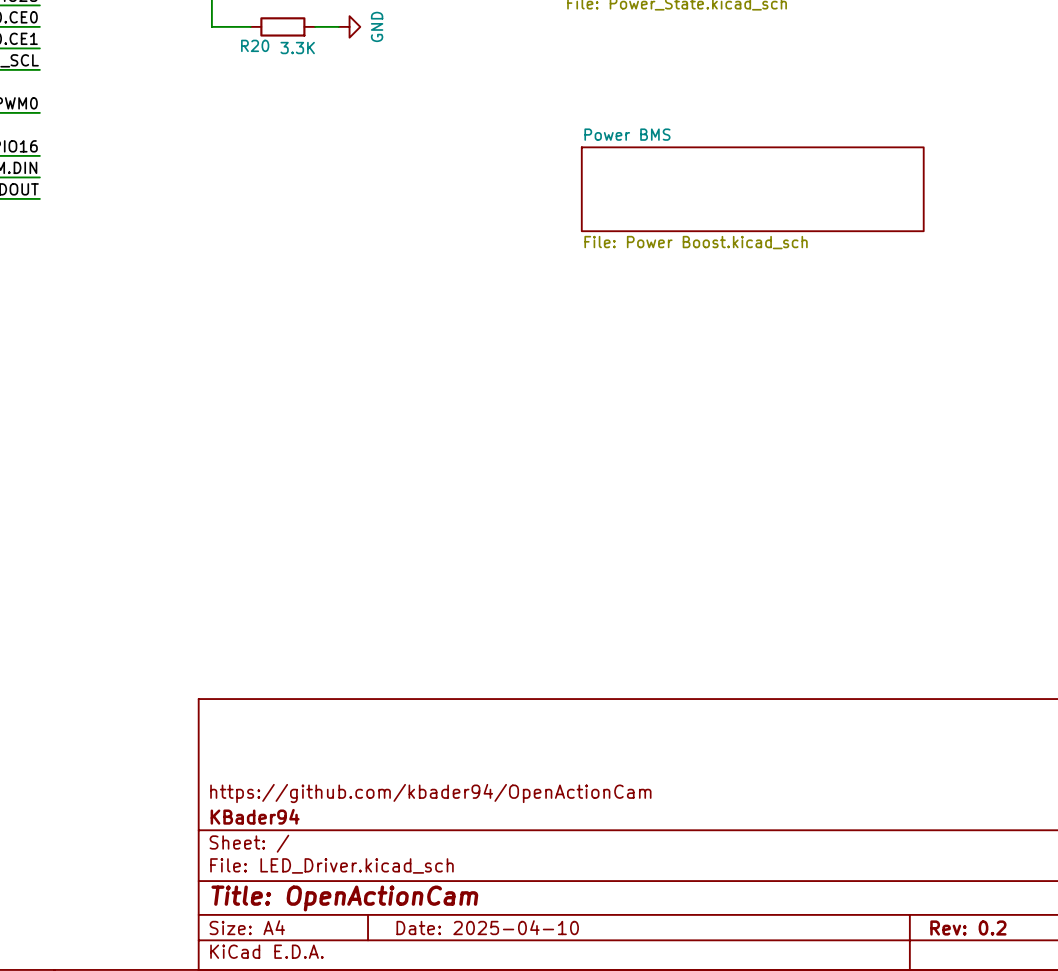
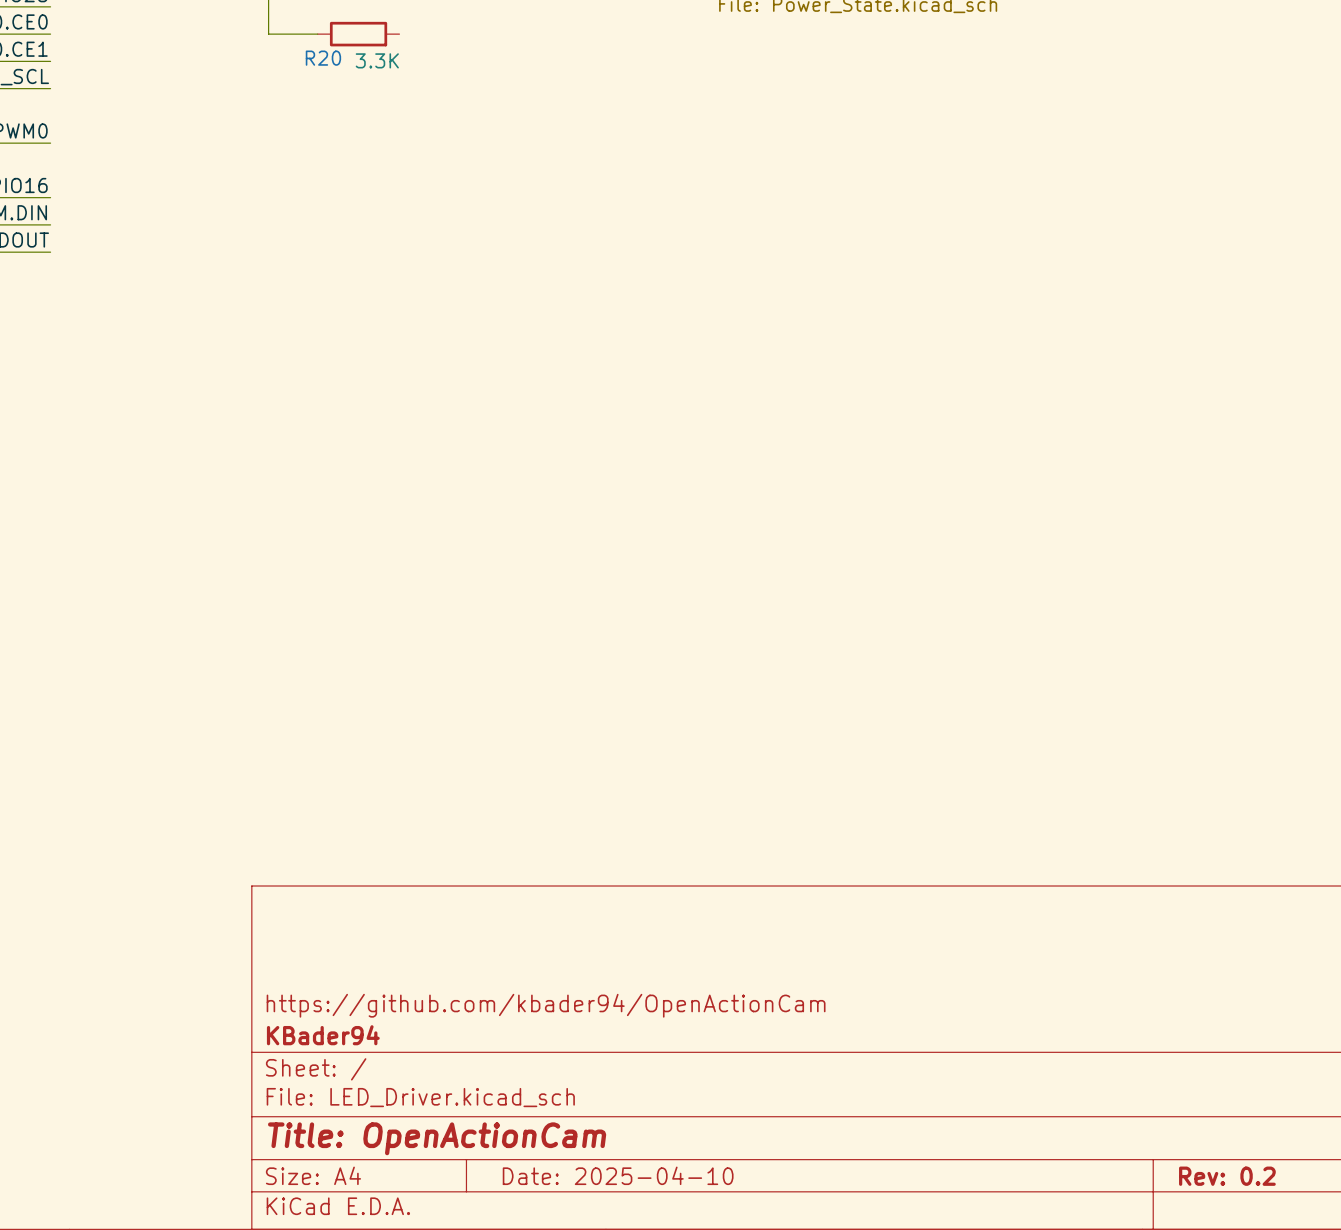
wire: (315, 26) (338, 26) -> none
power symbol: GND (349, 26) -> none
sheet Power BMS: File: Power Boost.kicad_sch (752, 189) -> none

